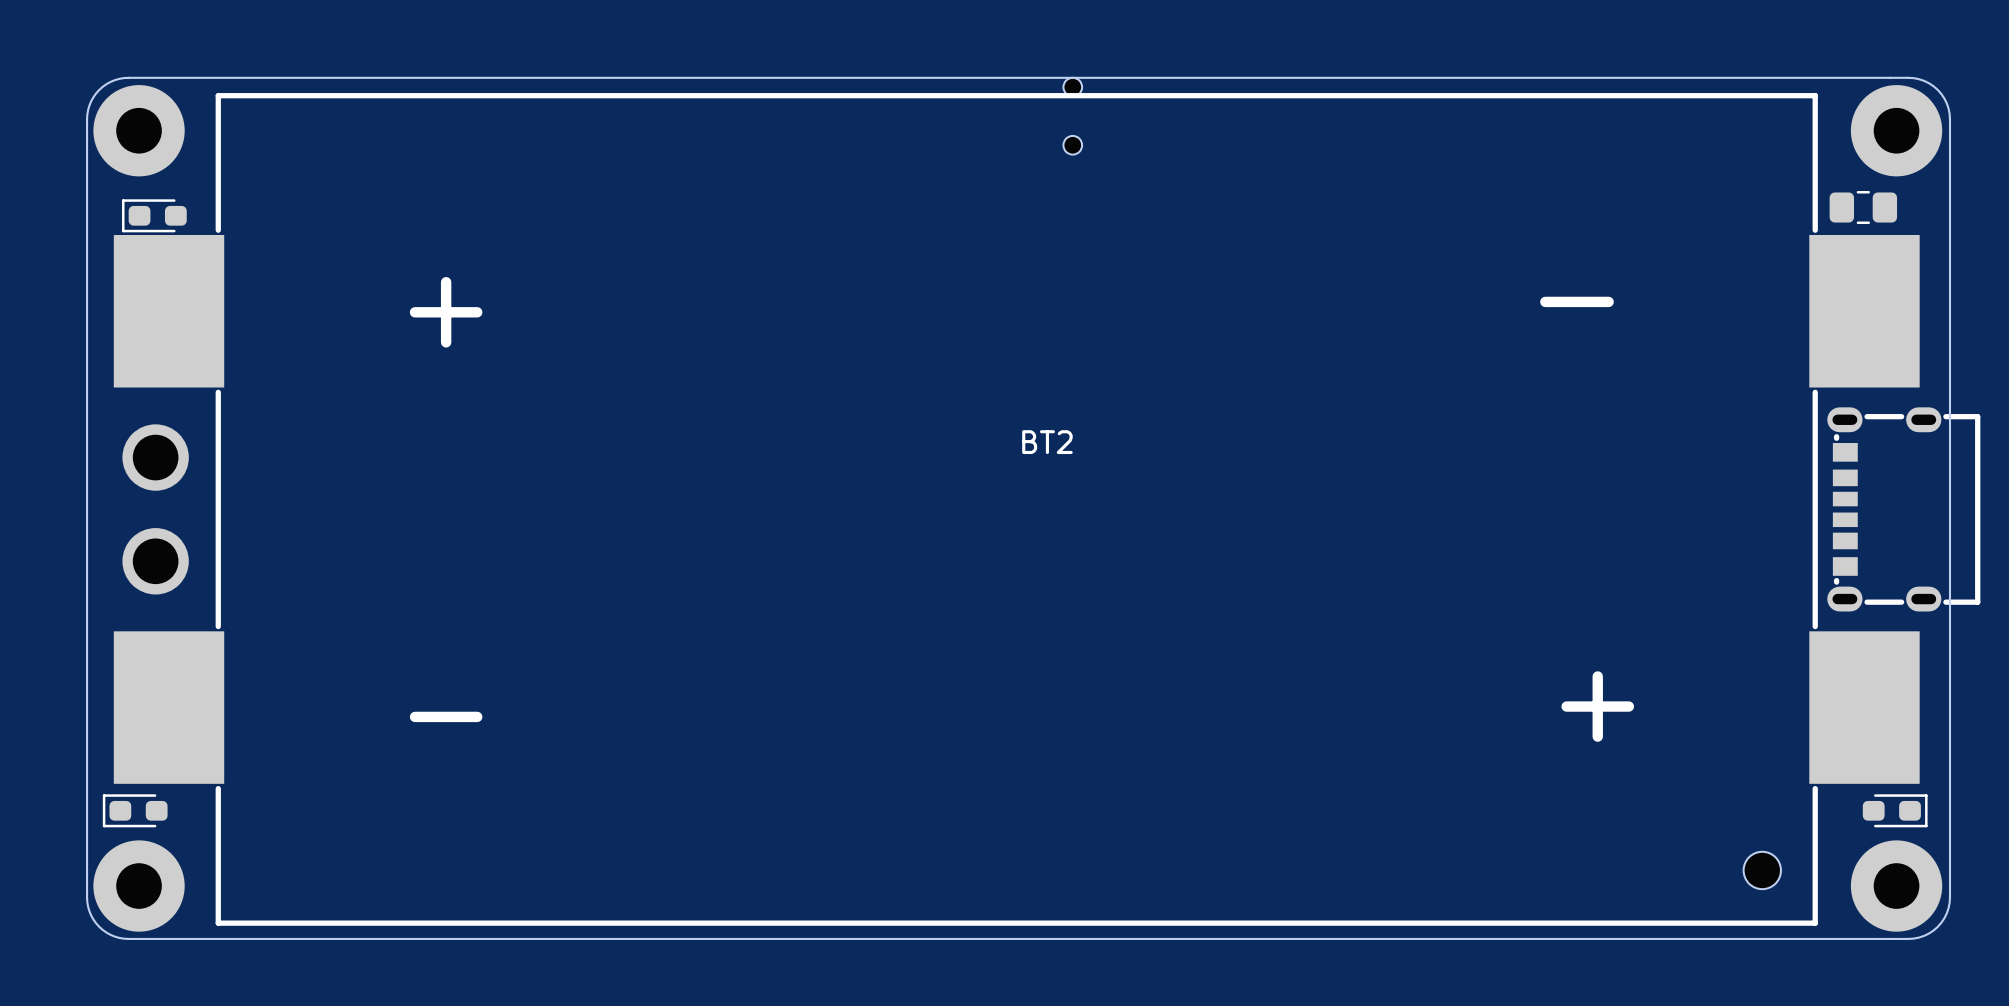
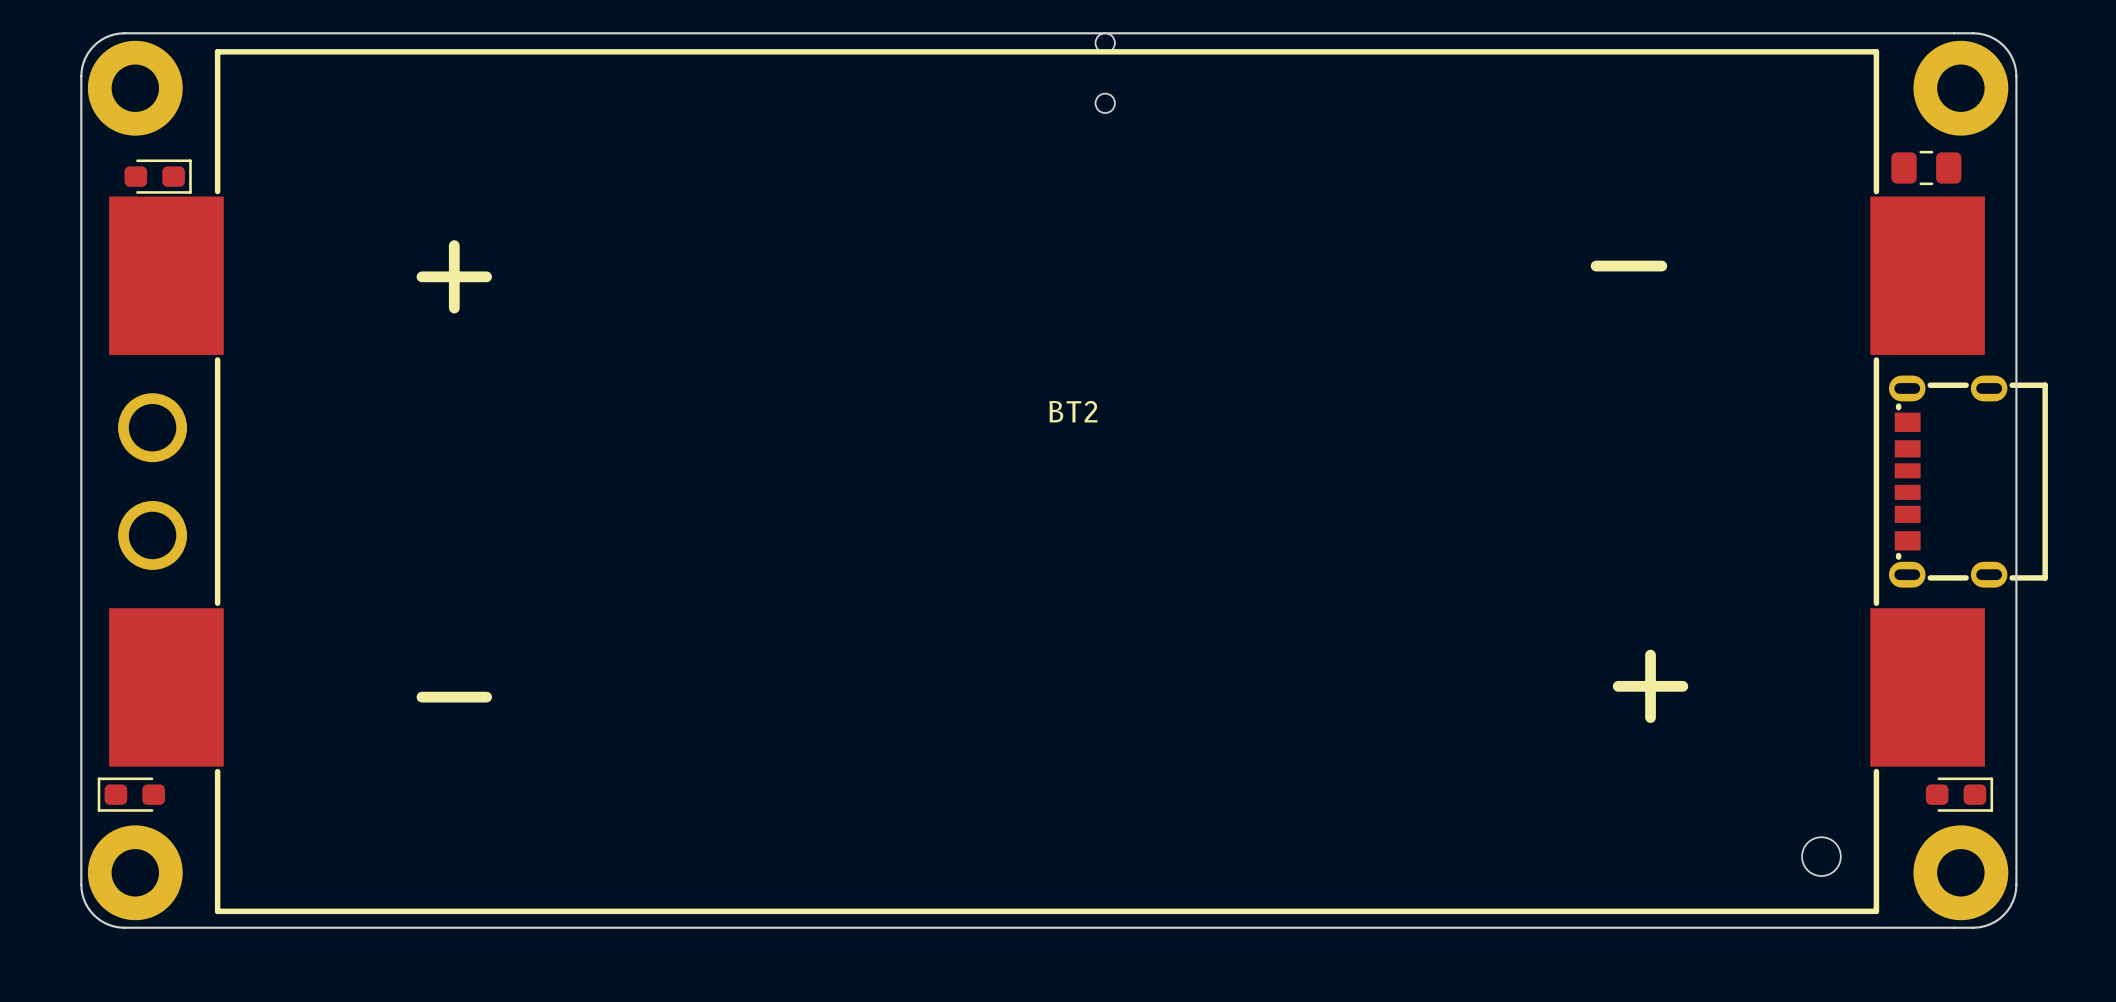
part rotation: 0° (154, 215) -> 180° (158, 176)

